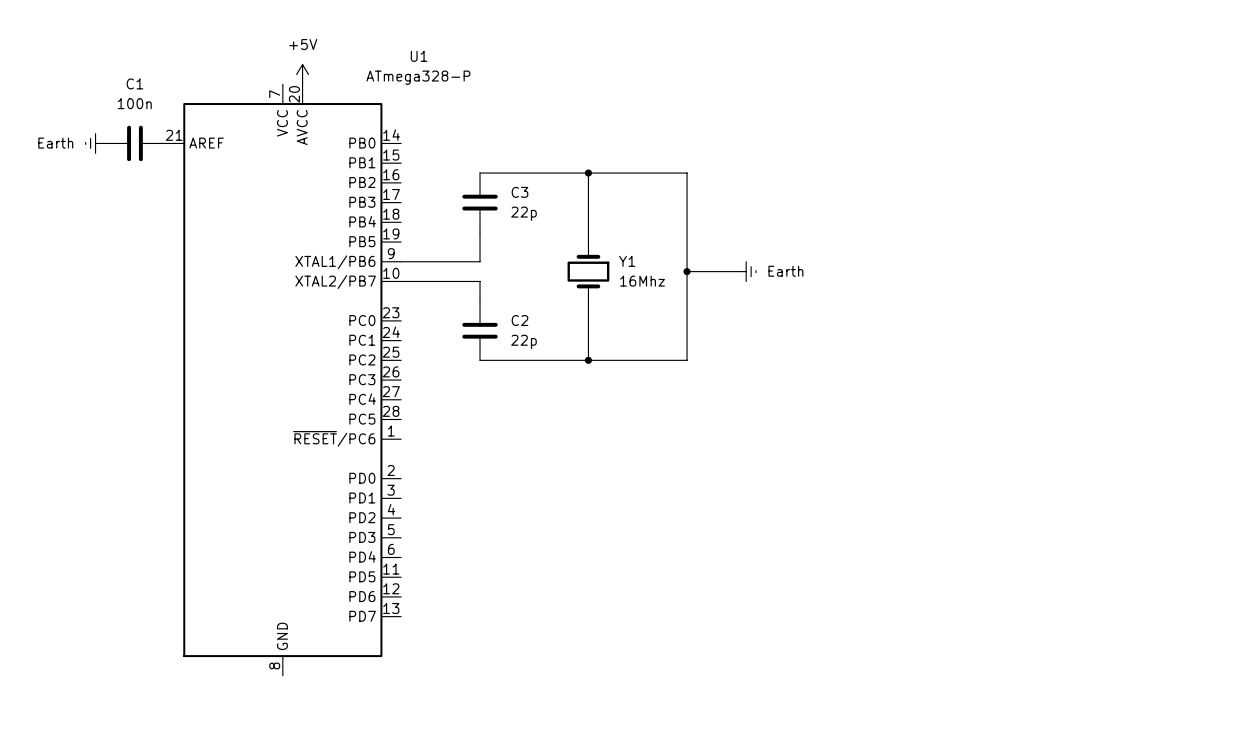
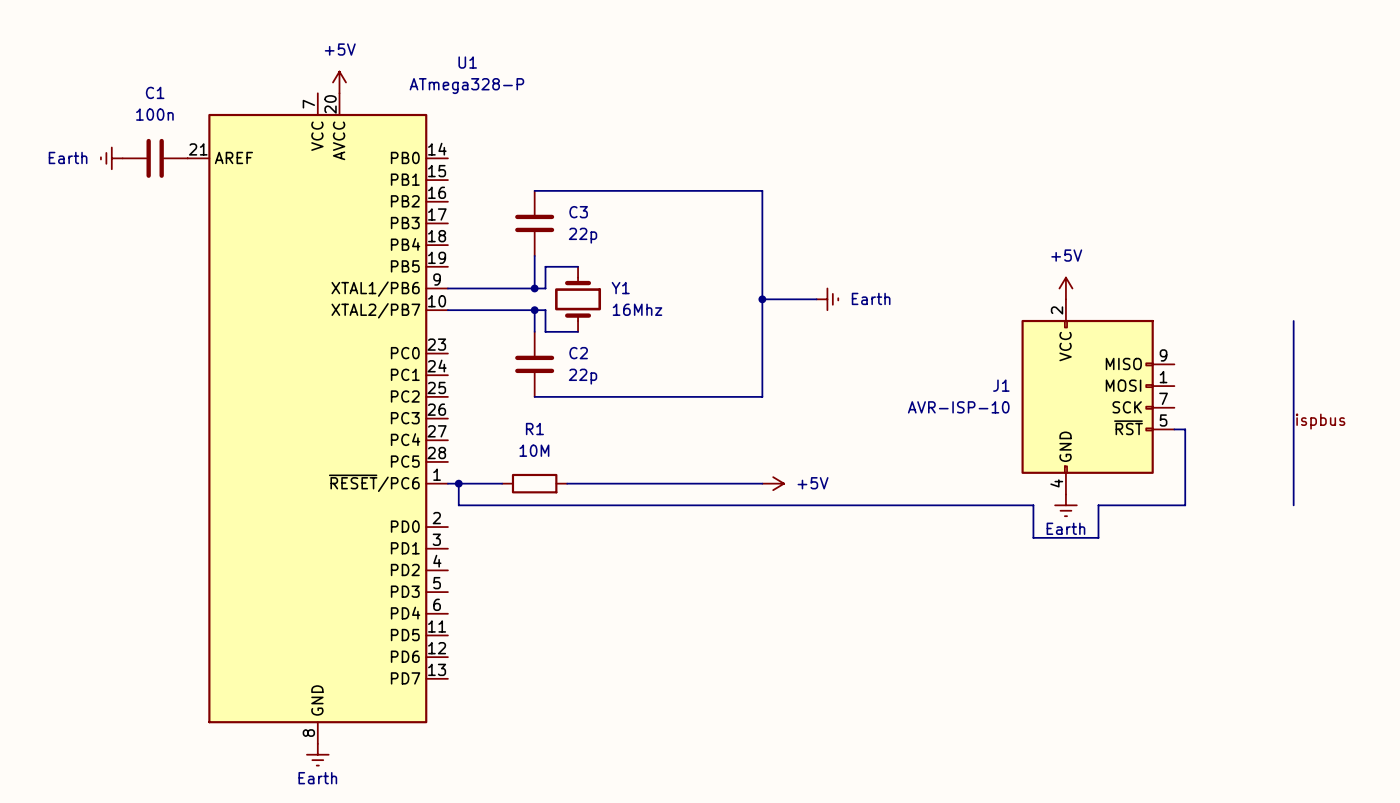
wire: (588, 173) (588, 242) -> none
junction: (588, 173) -> none
wire: none -> (578, 266) (545, 266) (545, 288) (534, 288)
junction: none -> (534, 288)
power symbol: none -> +5V (1065, 288)
Y1 position: (588, 271) -> (578, 299)
wire: none -> (534, 310) (545, 310) (545, 331) (578, 331)
junction: none -> (534, 310)
bus: none -> (1293, 321) (1293, 505)
wire: (588, 301) (588, 360) -> none
junction: (588, 360) -> none
J1: none -> AVR-ISP-10 (1097, 396)
label: none -> ispbus (1320, 421)
wire: none -> (1174, 429) (1185, 429) (1185, 505) (1098, 505) (1098, 537) (1033, 537) (1033, 505) (458, 505) (458, 483)
wire: none -> (447, 483) (502, 483)
junction: none -> (458, 483)
R1: none -> 10M (534, 483)
wire: none -> (567, 483) (762, 483)
power symbol: none -> +5V (773, 483)
power symbol: none -> Earth (1065, 505)
power symbol: none -> Earth (317, 754)

